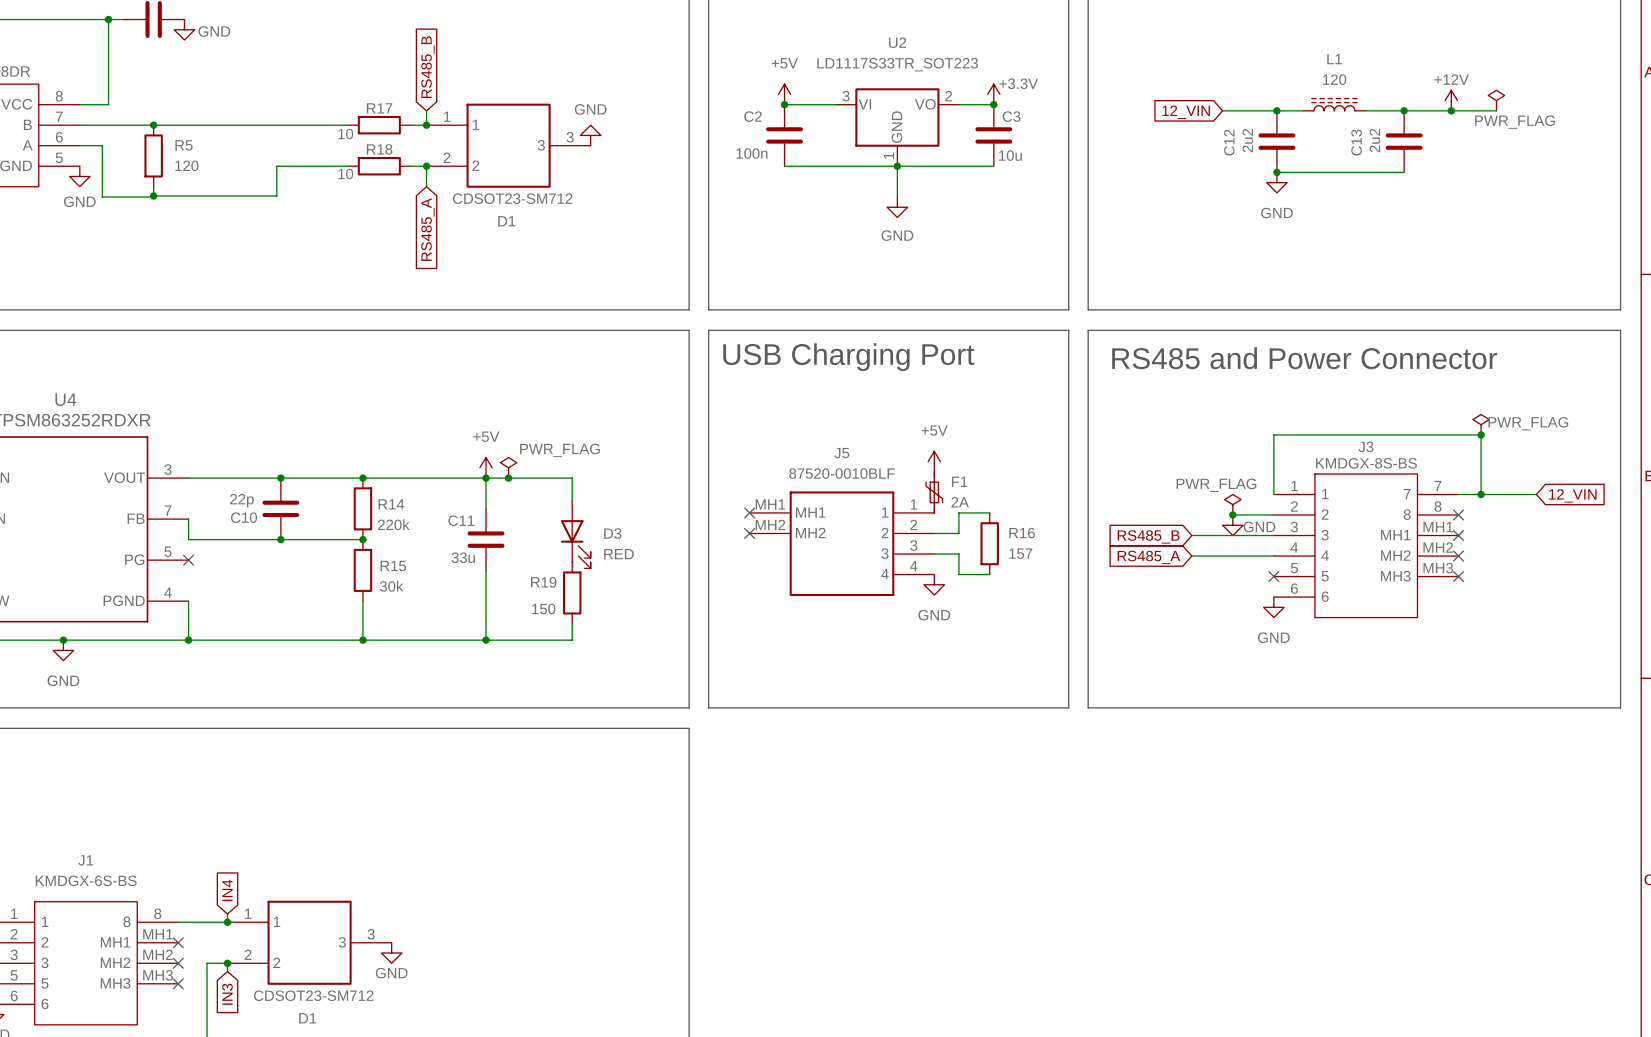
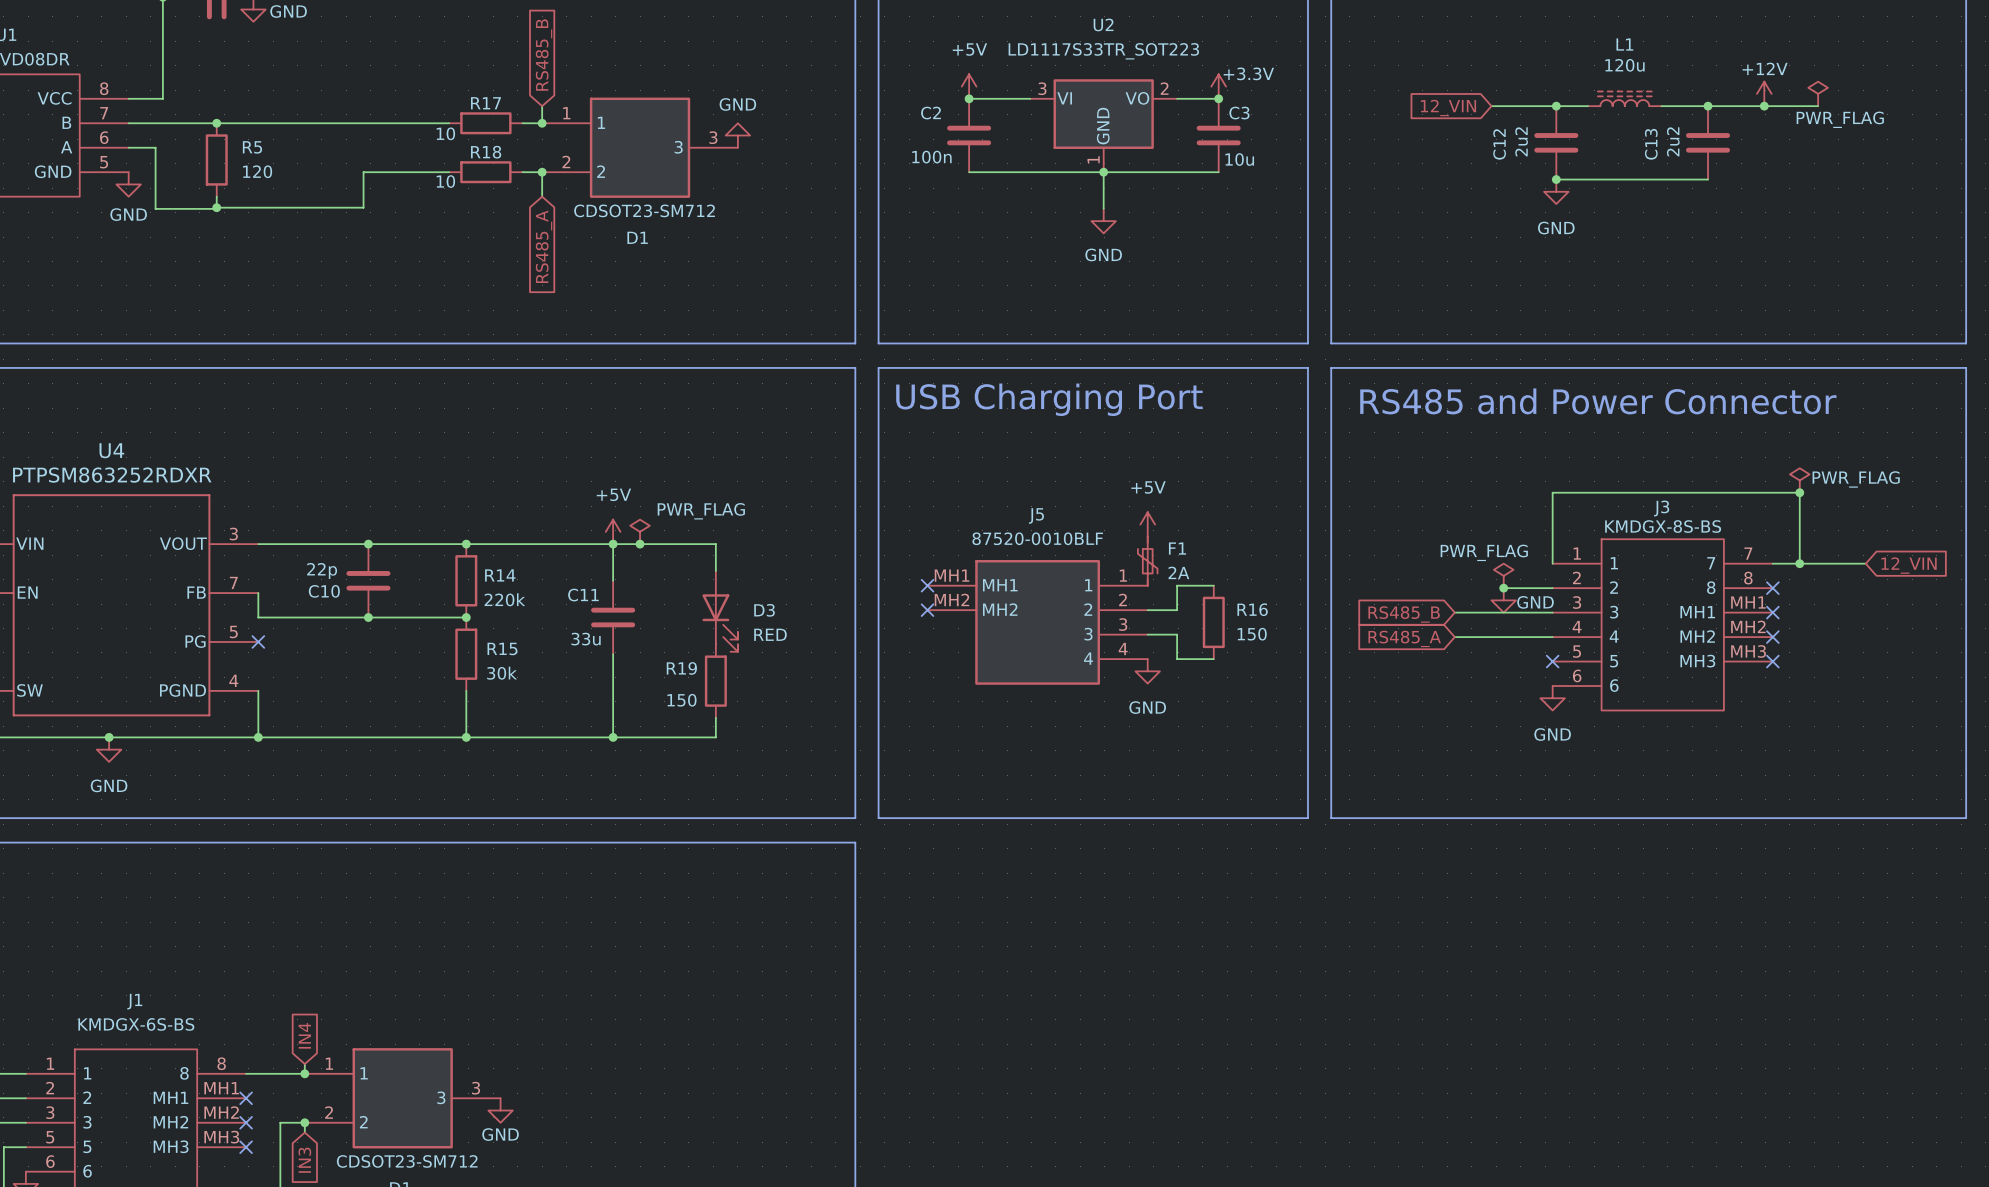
L1 value: 120 (1334, 79) -> 120u (1624, 65)
R16 value: 157 (1020, 553) -> 150 (1252, 634)

